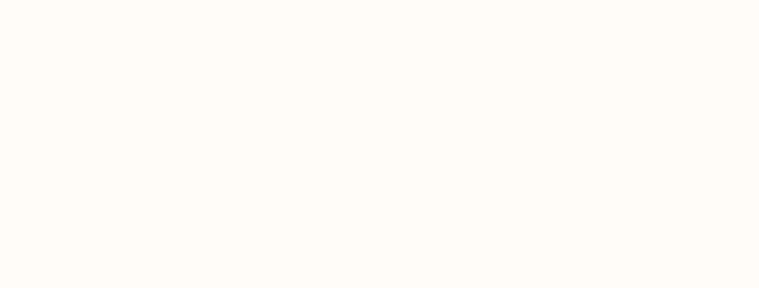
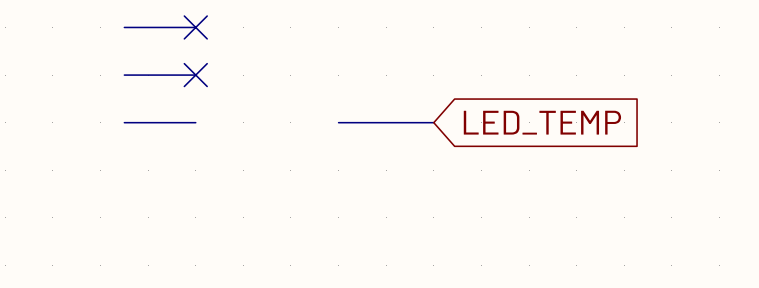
wire: none -> (124, 27) (195, 27)
no-connect mark: none -> (195, 27)
wire: none -> (124, 75) (195, 75)
no-connect mark: none -> (195, 75)
wire: none -> (124, 122) (195, 122)
wire: none -> (338, 122) (433, 122)
global label: none -> LED_TEMP (542, 122)

